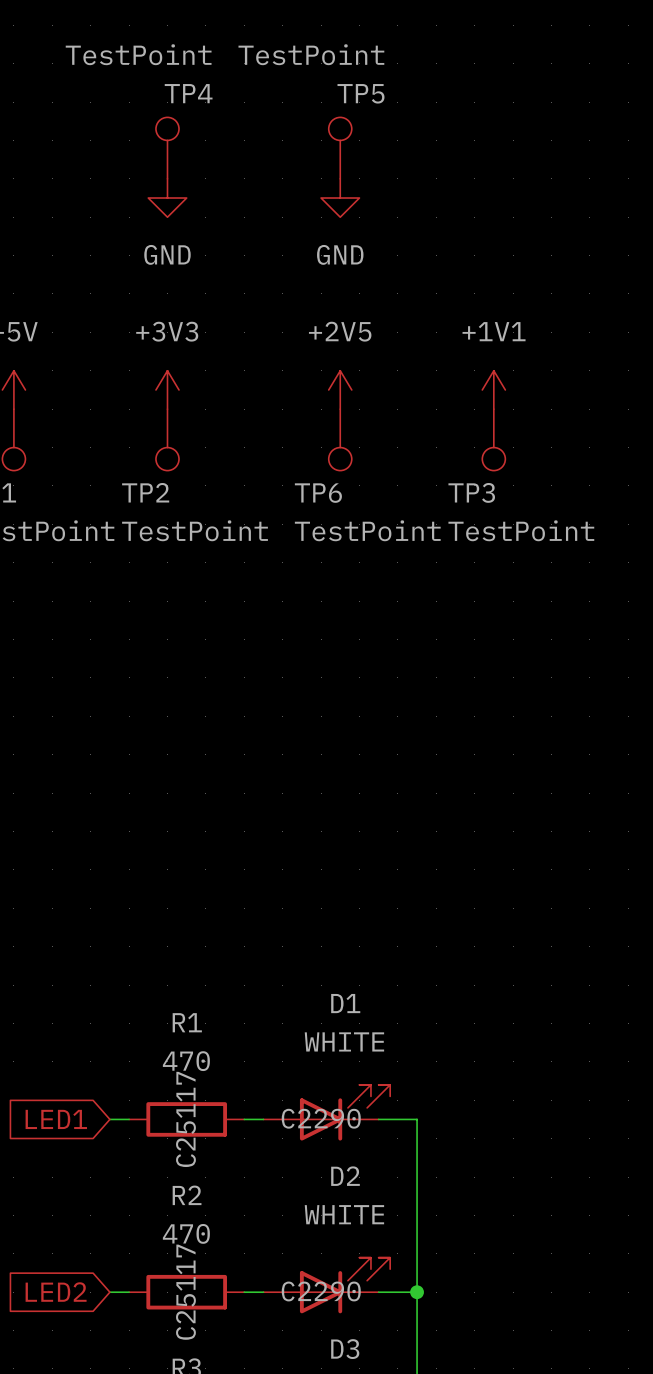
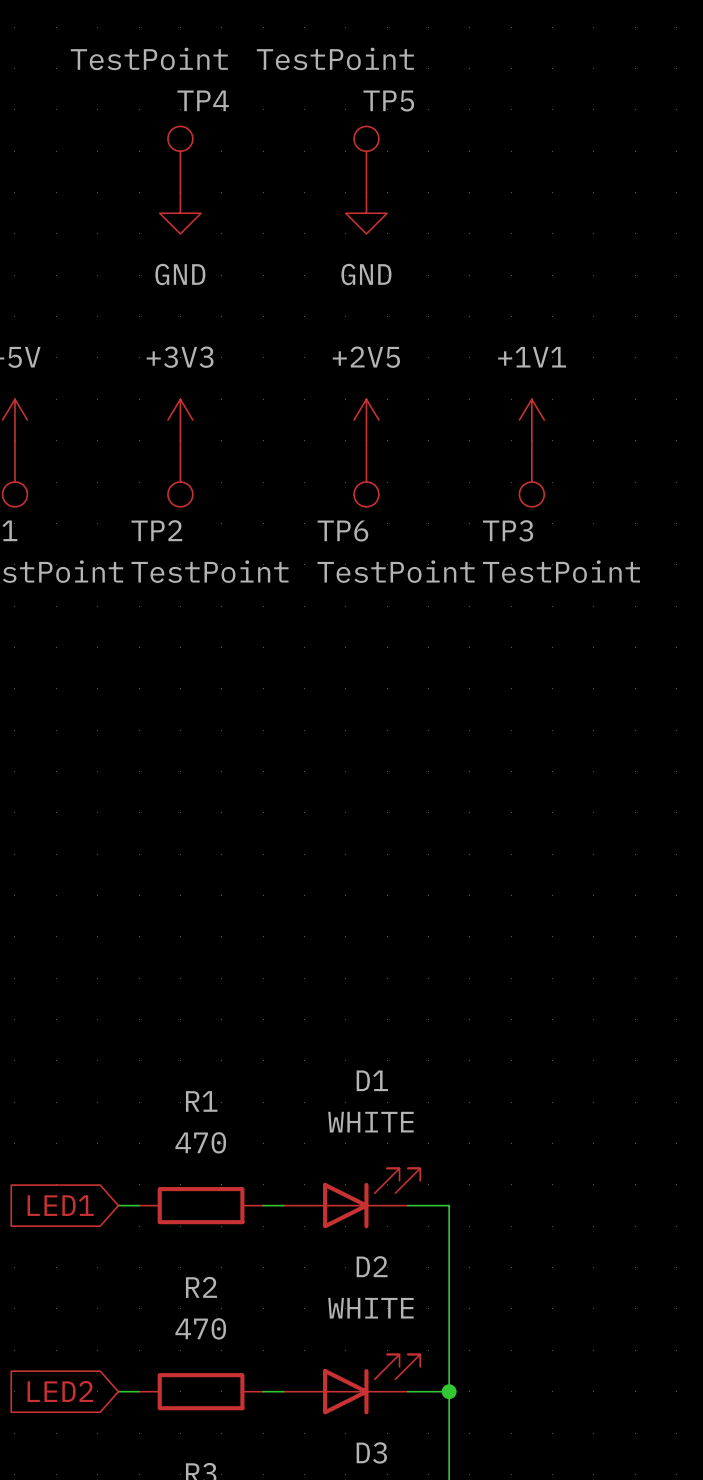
D1 text: C2290 (321, 1118) -> none
R1 text: C25117 (185, 1119) -> none
D2 text: C2290 (321, 1291) -> none
R2 text: C25117 (185, 1292) -> none

